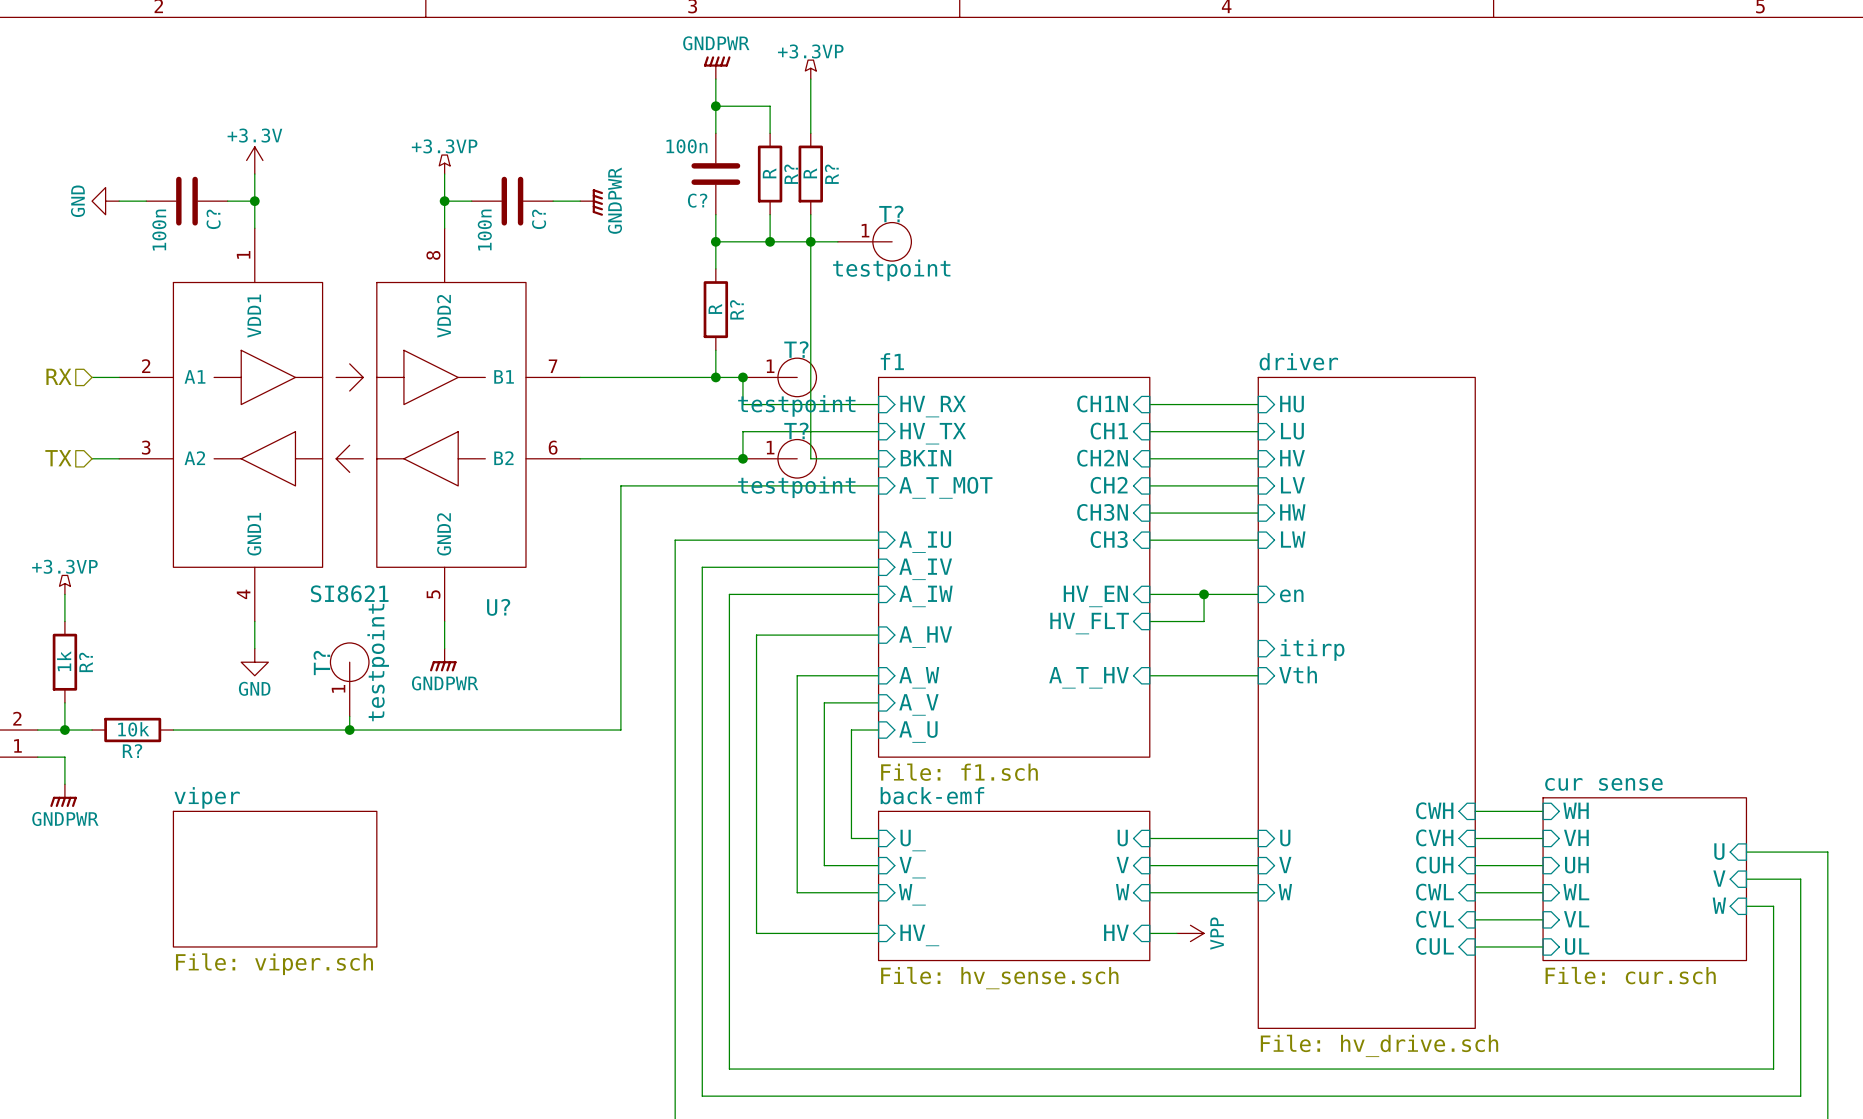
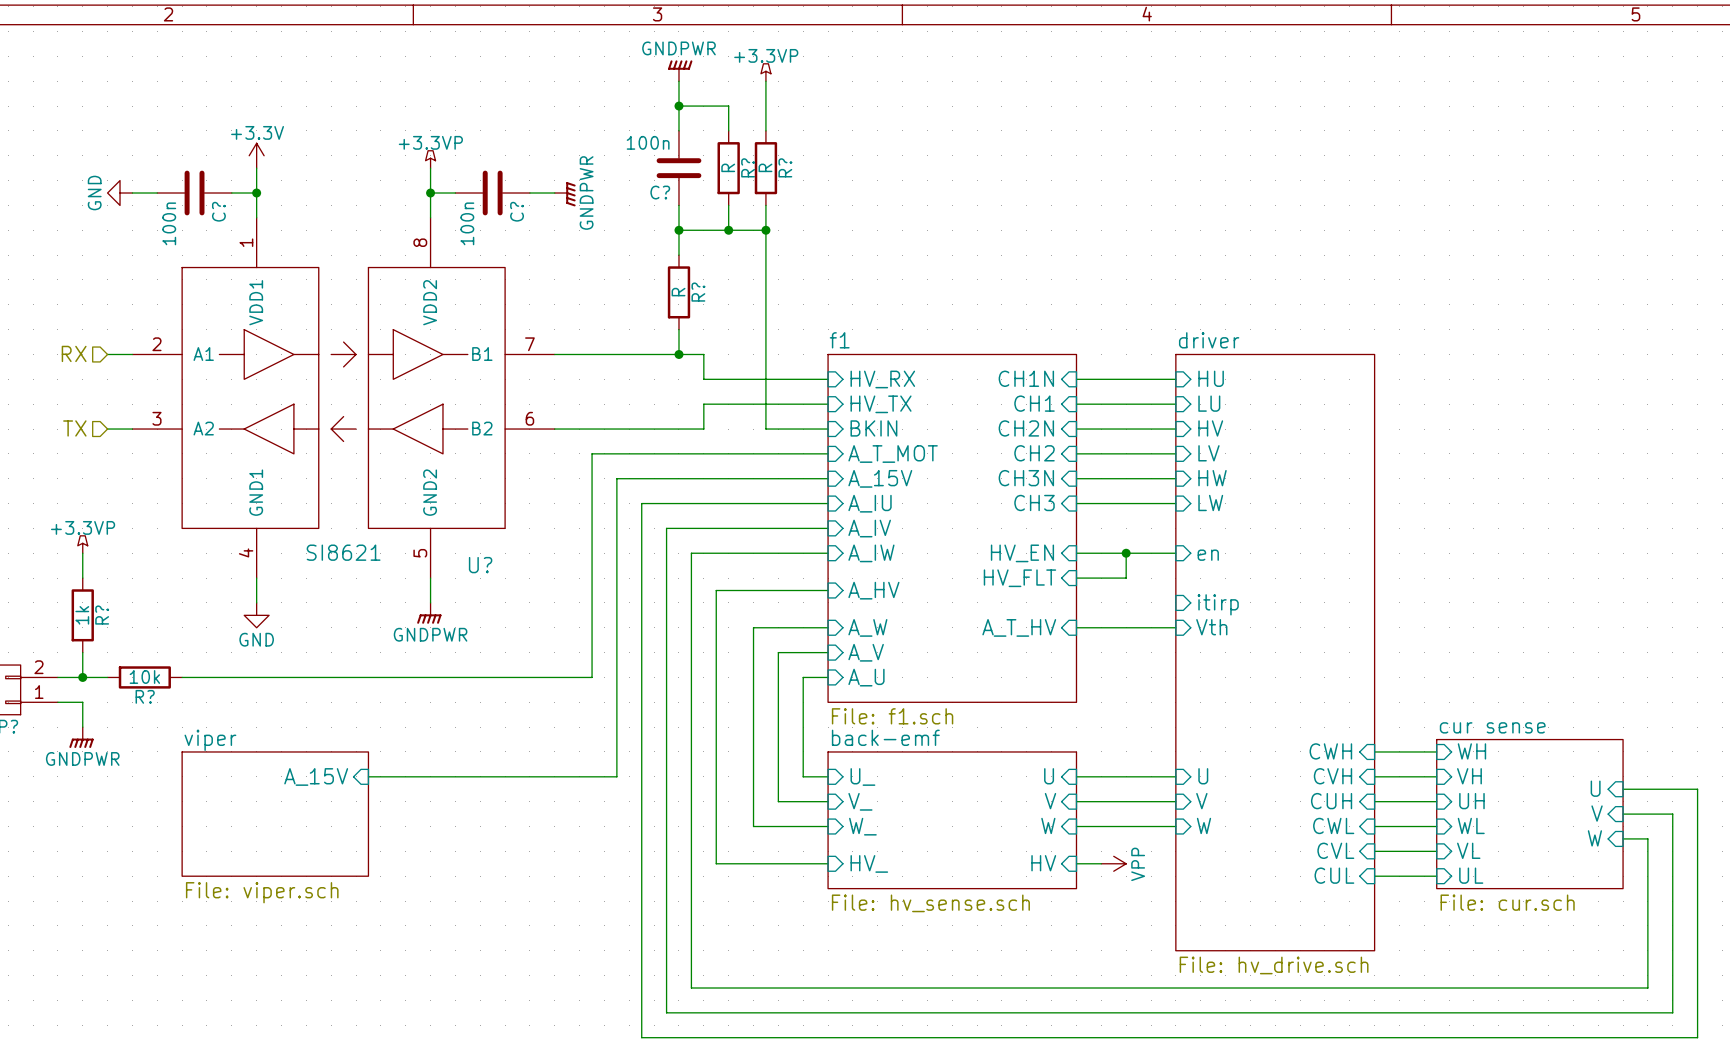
wire: (810, 241) (837, 241) -> none
T?: testpoint (874, 241) -> none
junction: (742, 377) -> none
T?: testpoint (779, 377) -> none
junction: (742, 458) -> none
T?: testpoint (779, 458) -> none
wire: none -> (828, 478) (616, 478) (616, 776) (368, 776)
sheet pin: none -> A_15V (880, 478)
T?: testpoint (349, 679) -> none
wire: (349, 716) (349, 730) -> none
junction: (349, 730) -> none
sheet pin: none -> A_15V (316, 776)

